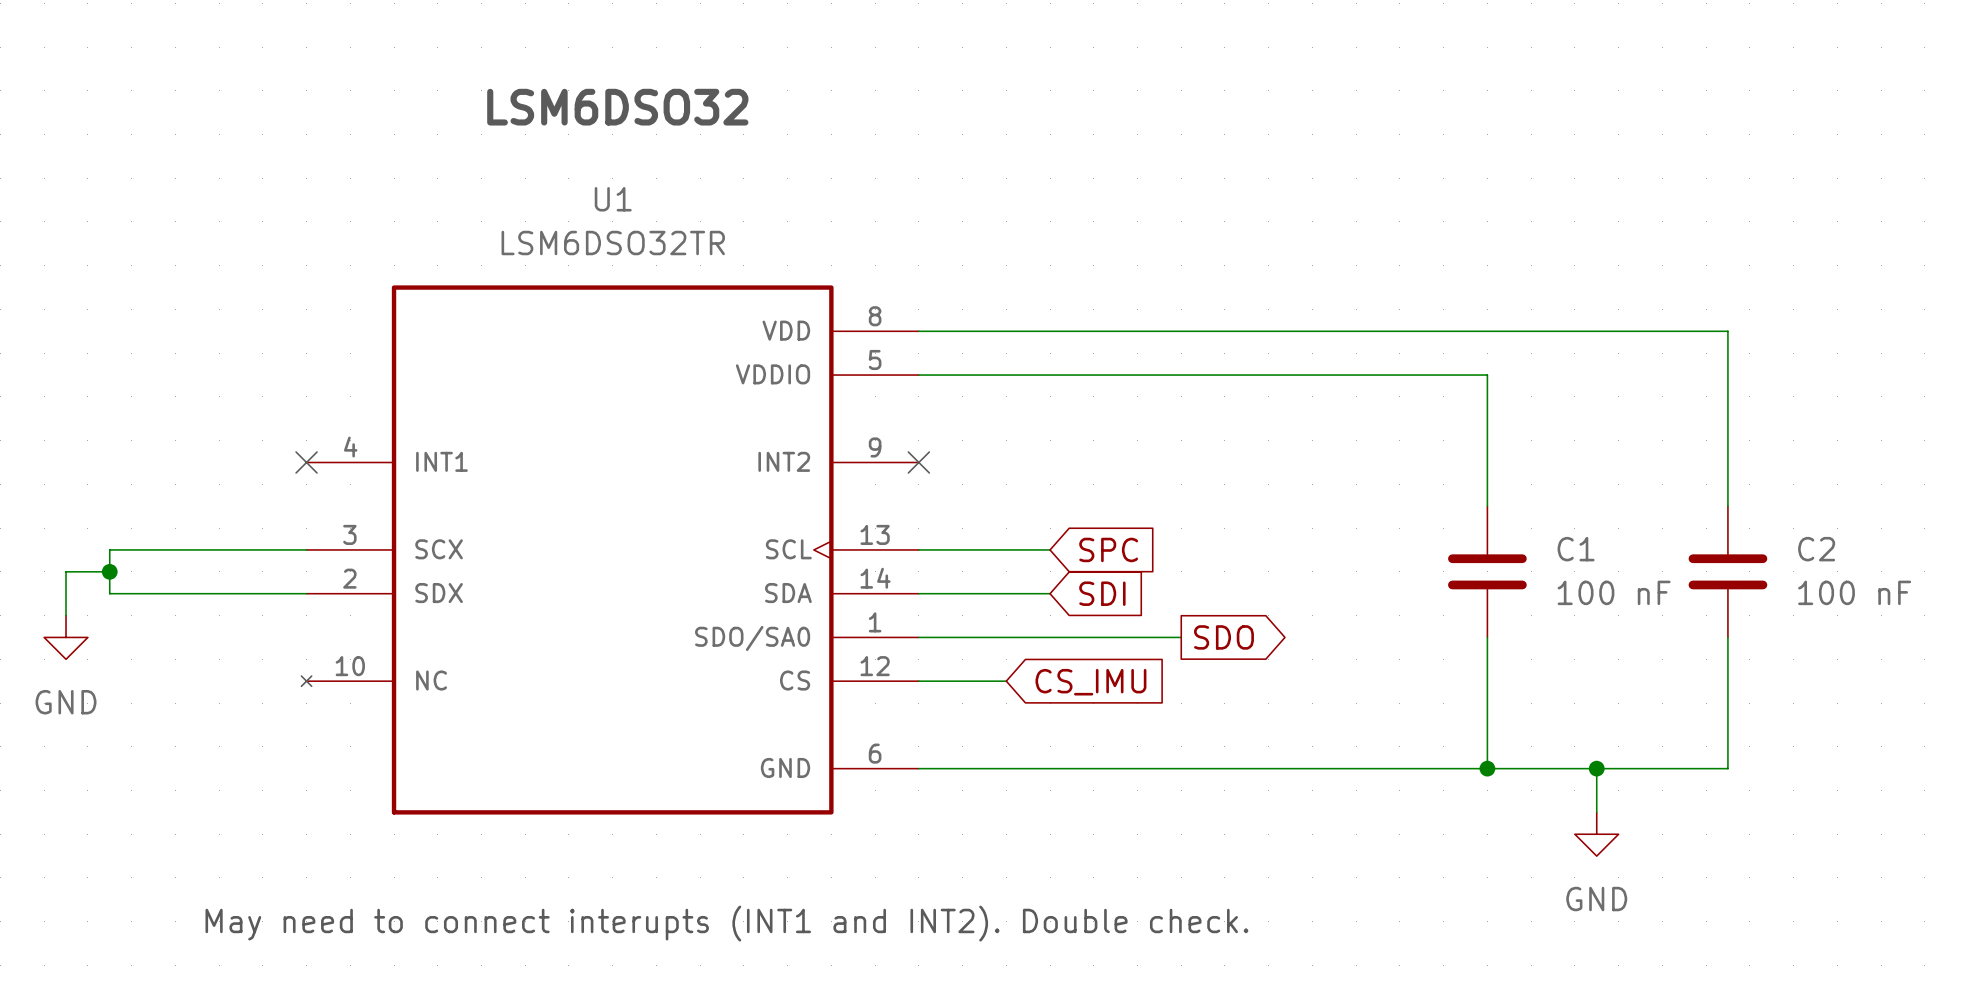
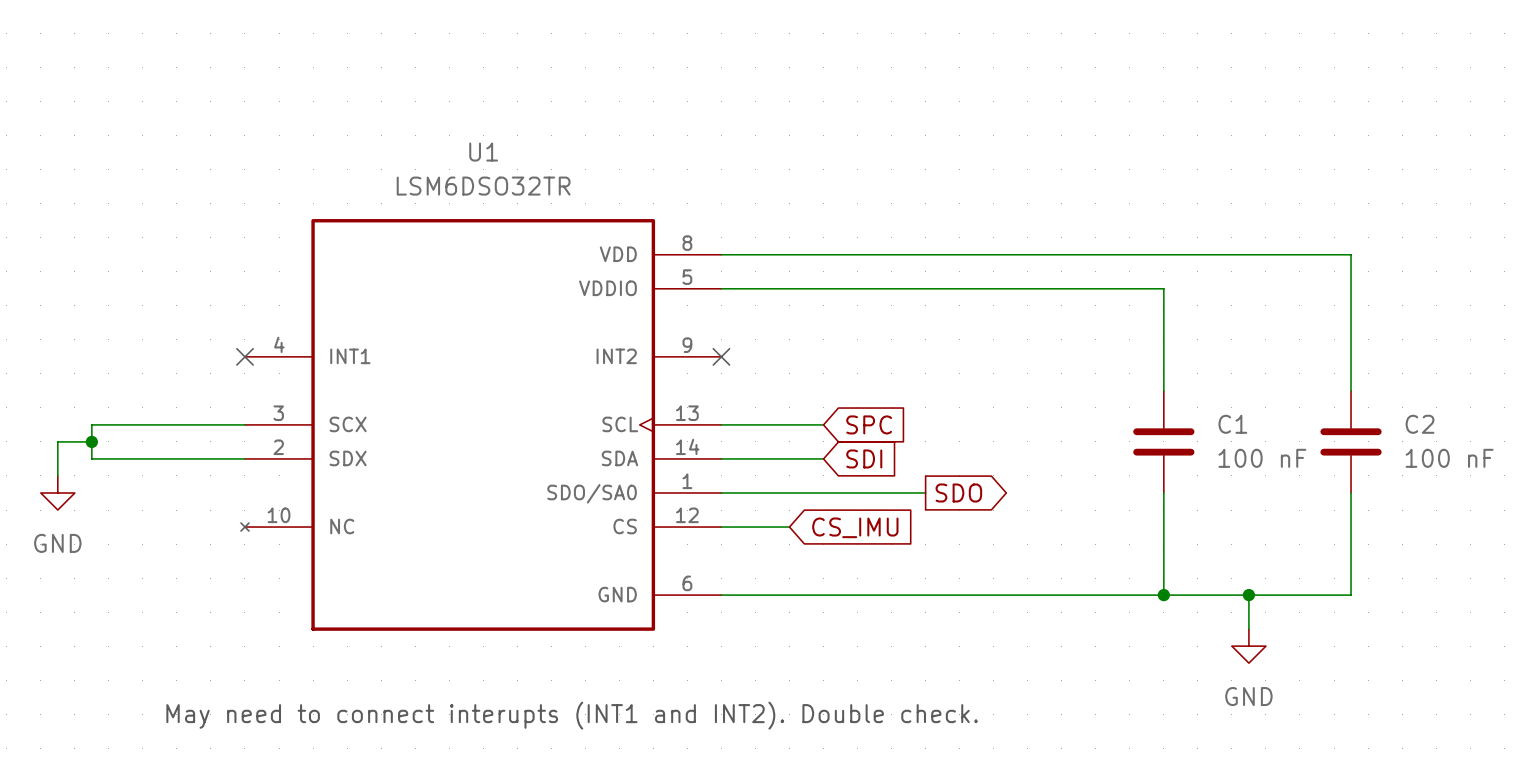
text: LSM6DSO32 (617, 107) -> none

